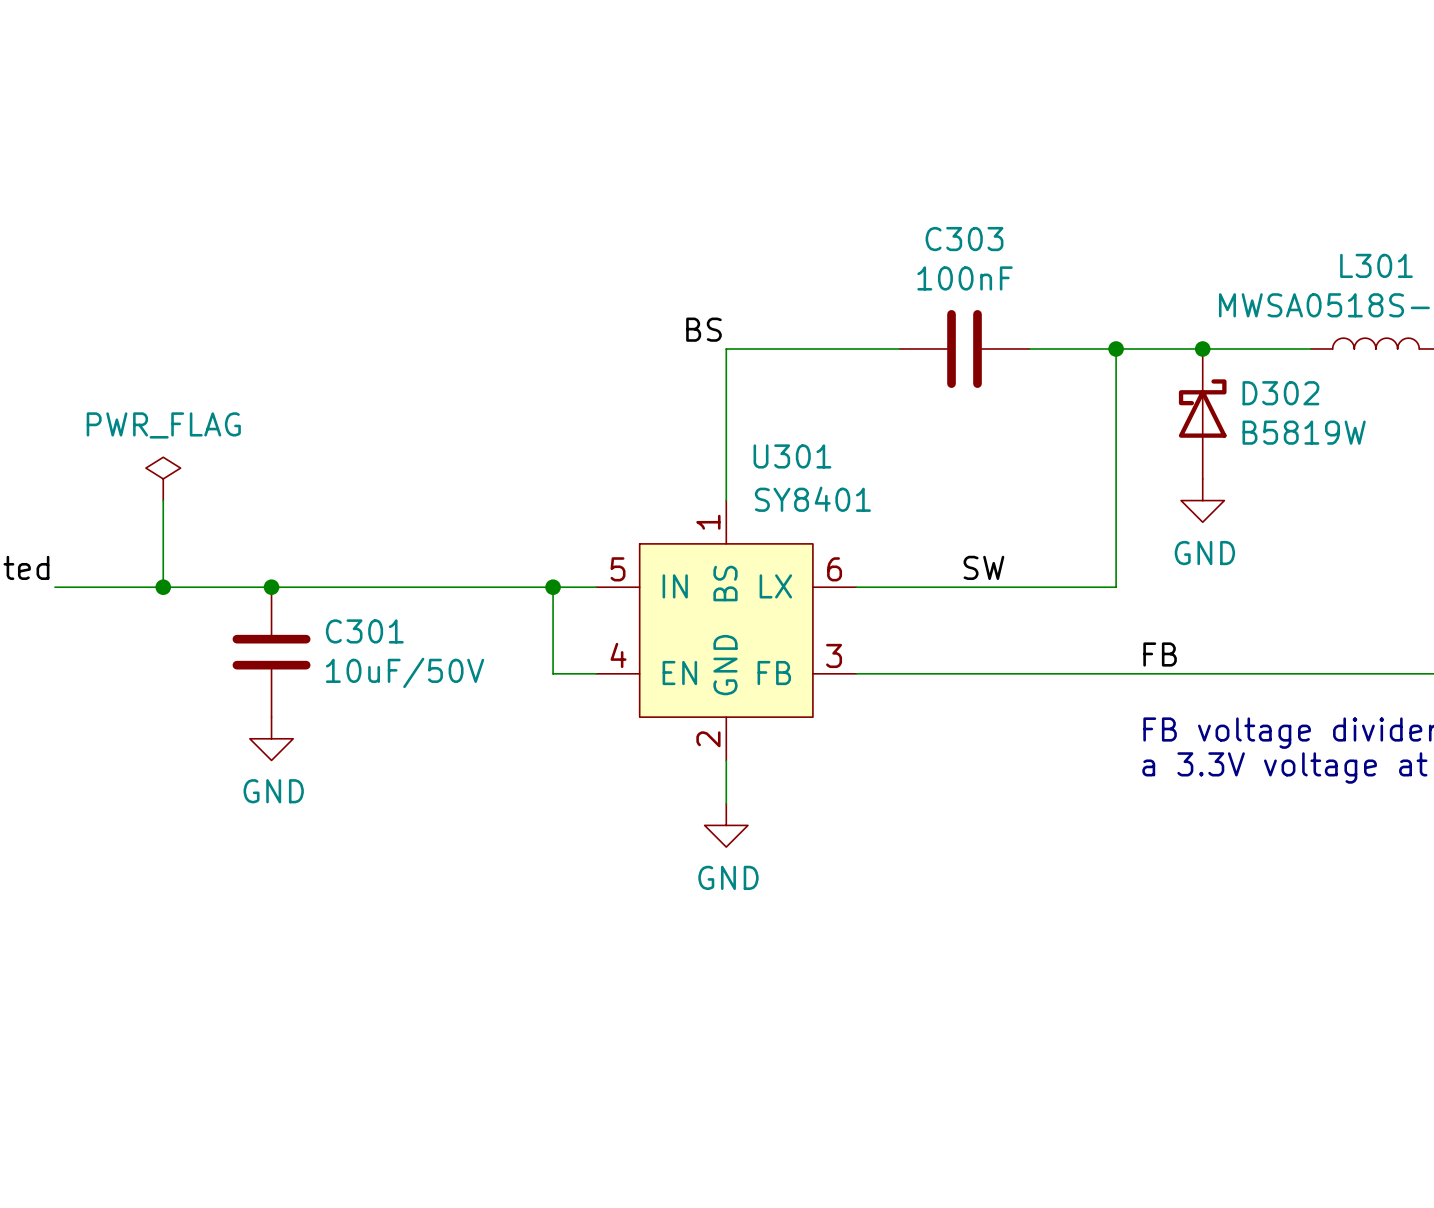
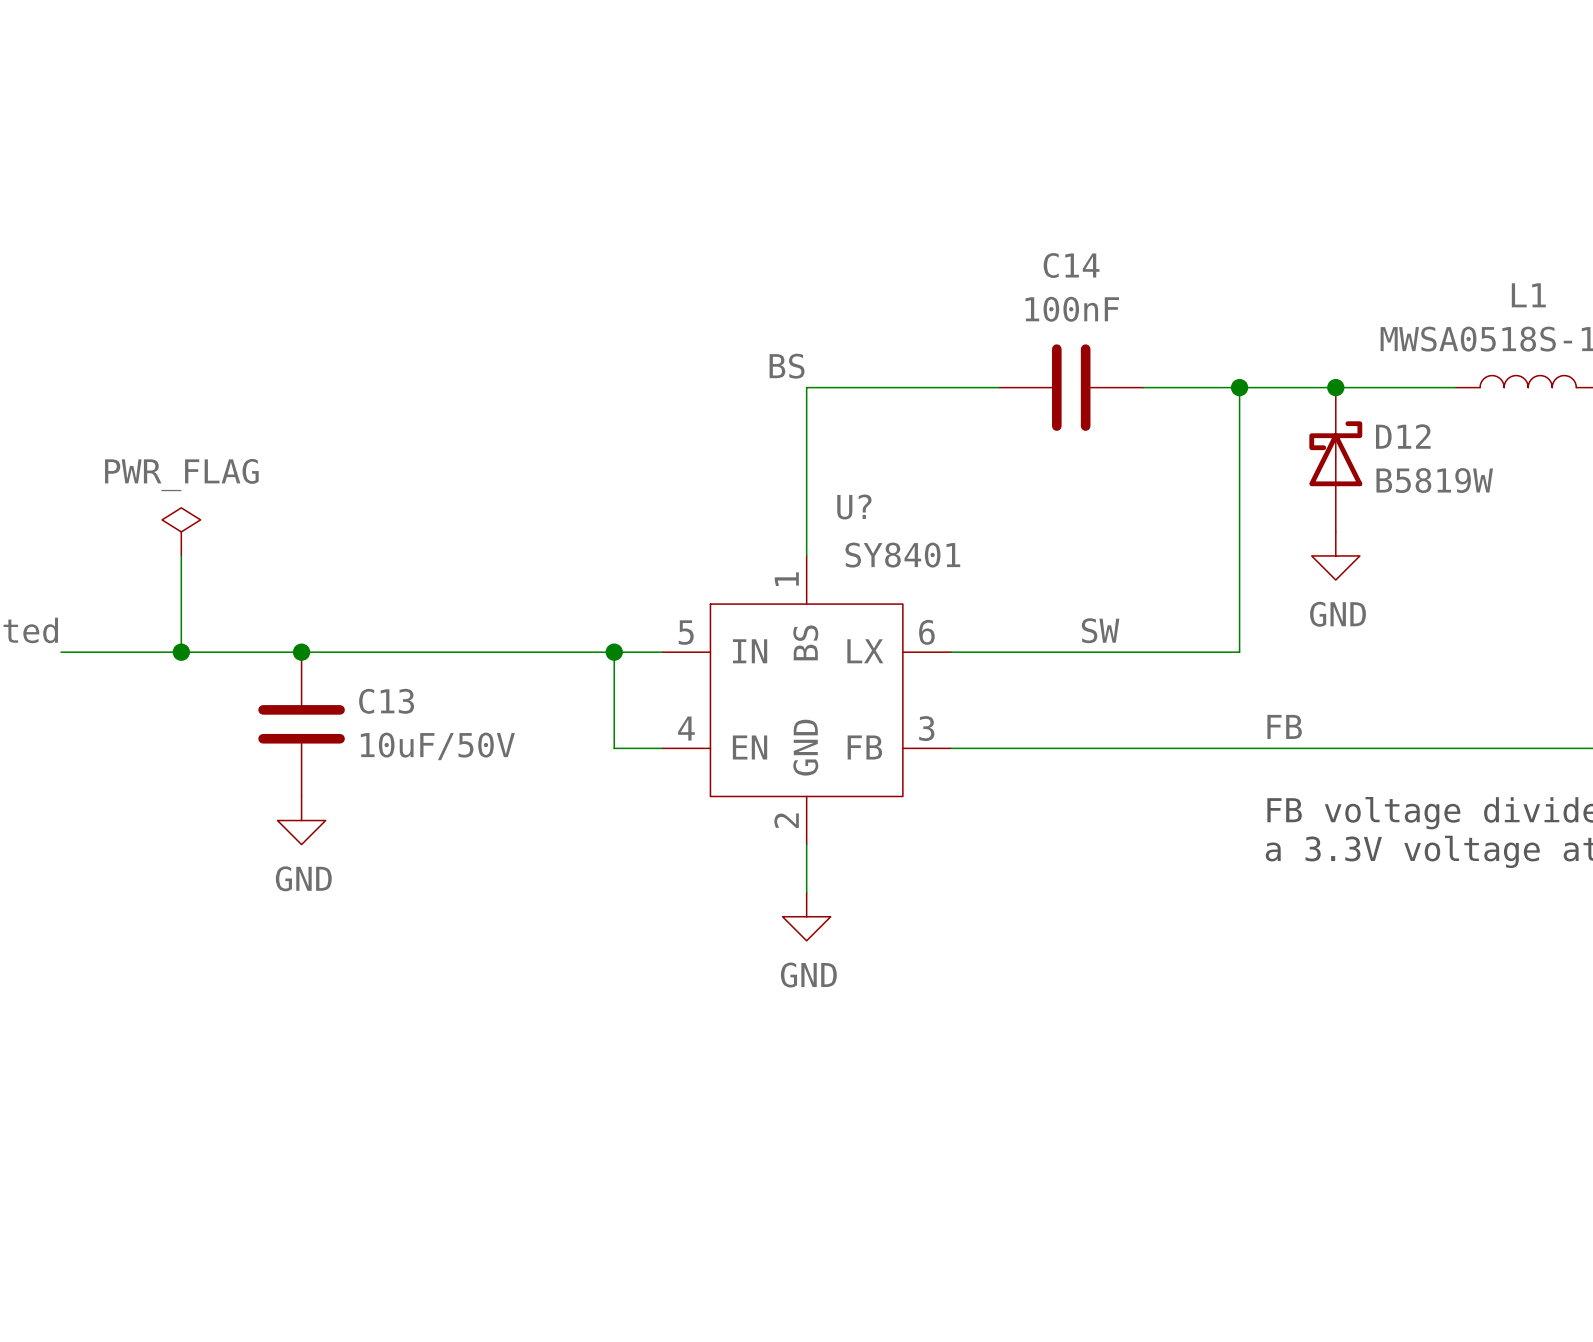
C303 name: C303 (964, 239) -> C14 (1071, 265)
L301 name: L301 (1376, 265) -> L1 (1528, 295)
D302 name: D302 (1280, 393) -> D12 (1403, 436)
U301 name: U301 (792, 456) -> U? (854, 506)
C301 name: C301 (364, 631) -> C13 (386, 701)

